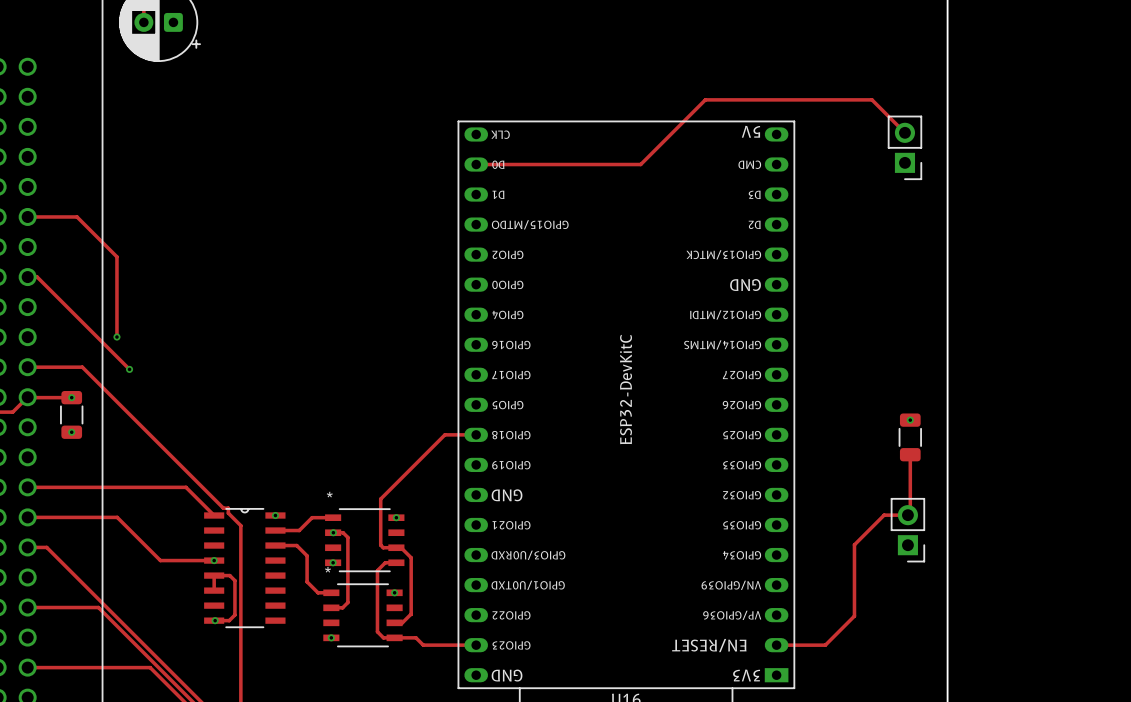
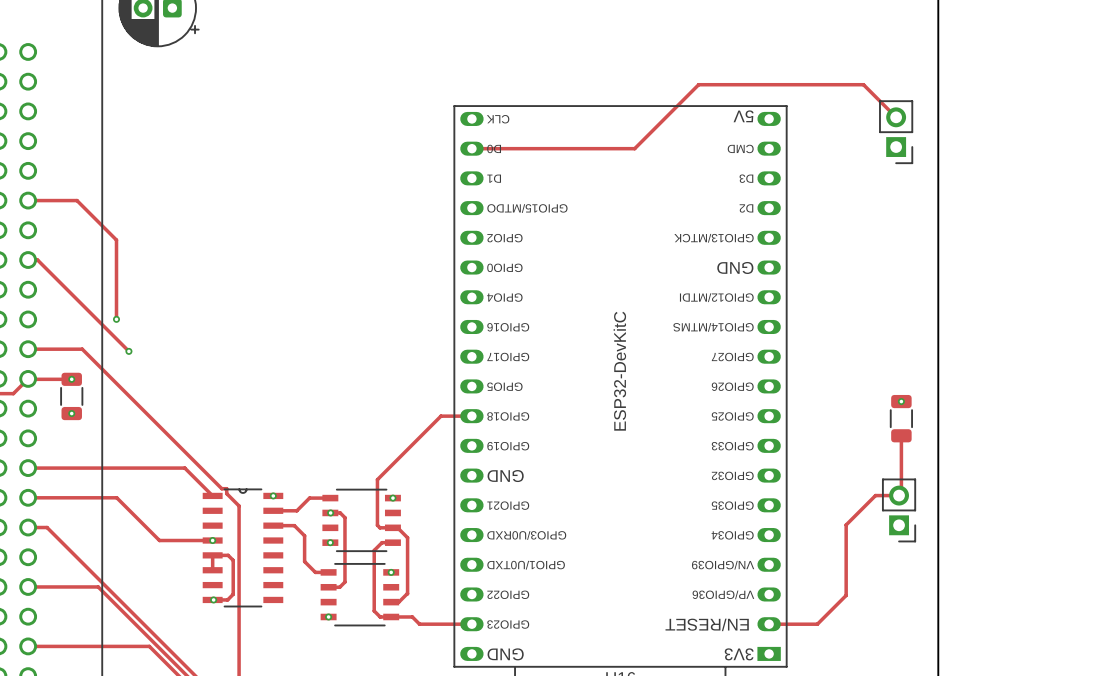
part text: * (329, 494) -> none
part text: * (328, 569) -> none

